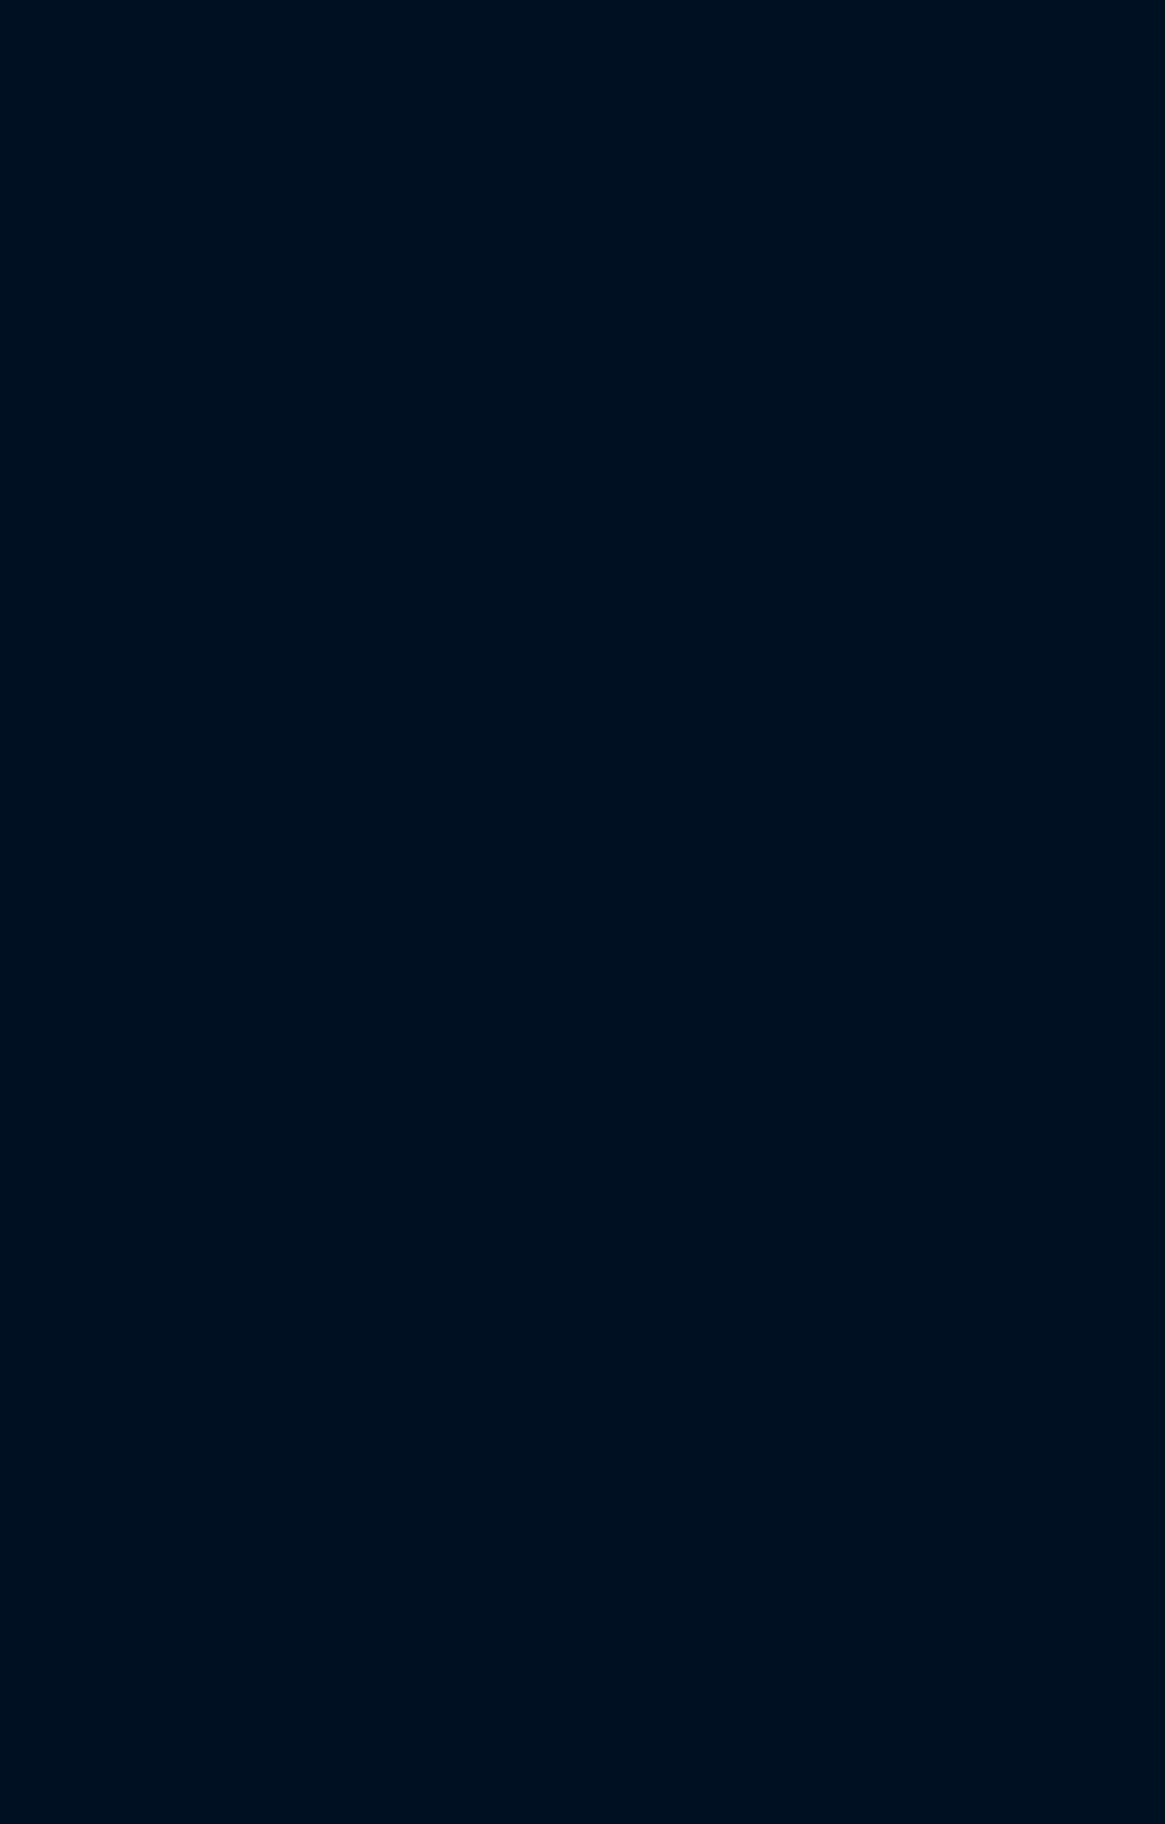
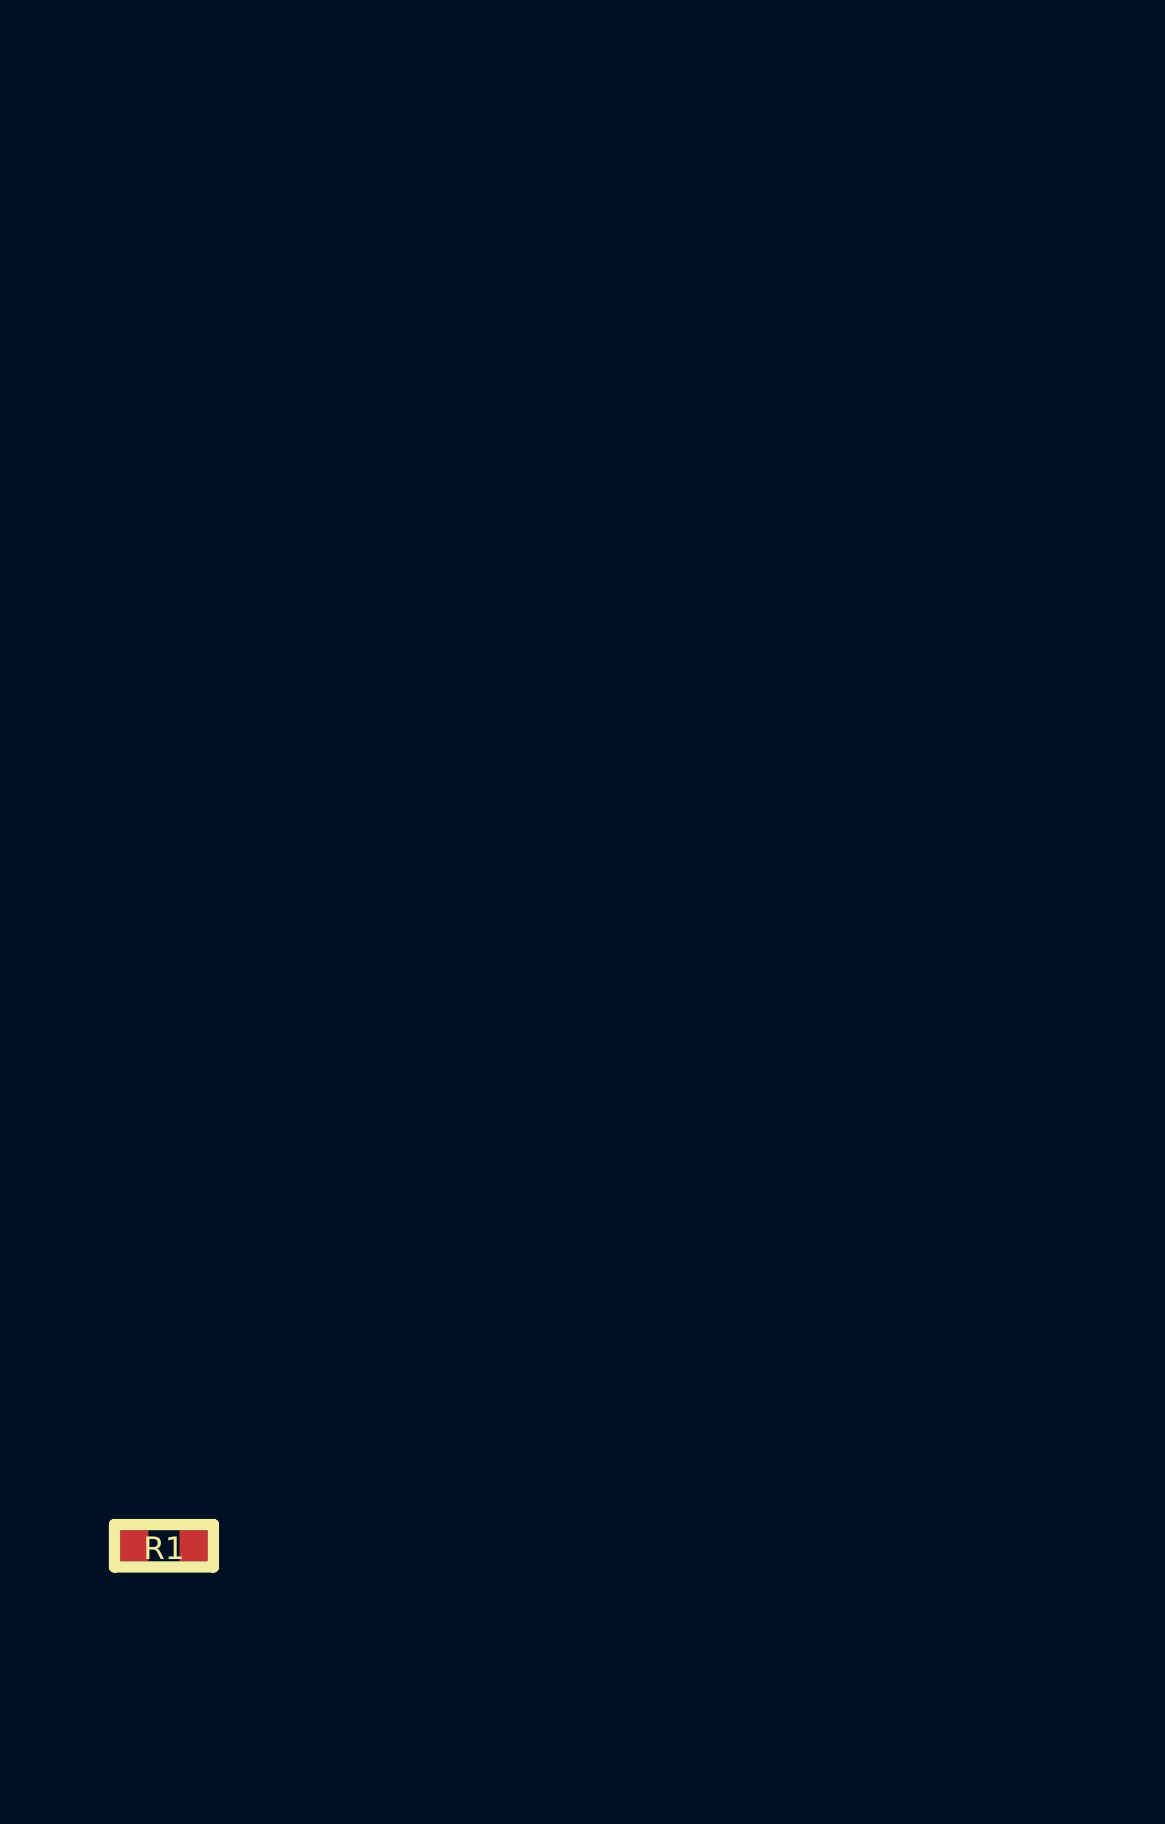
R1: none -> (163, 1545)

